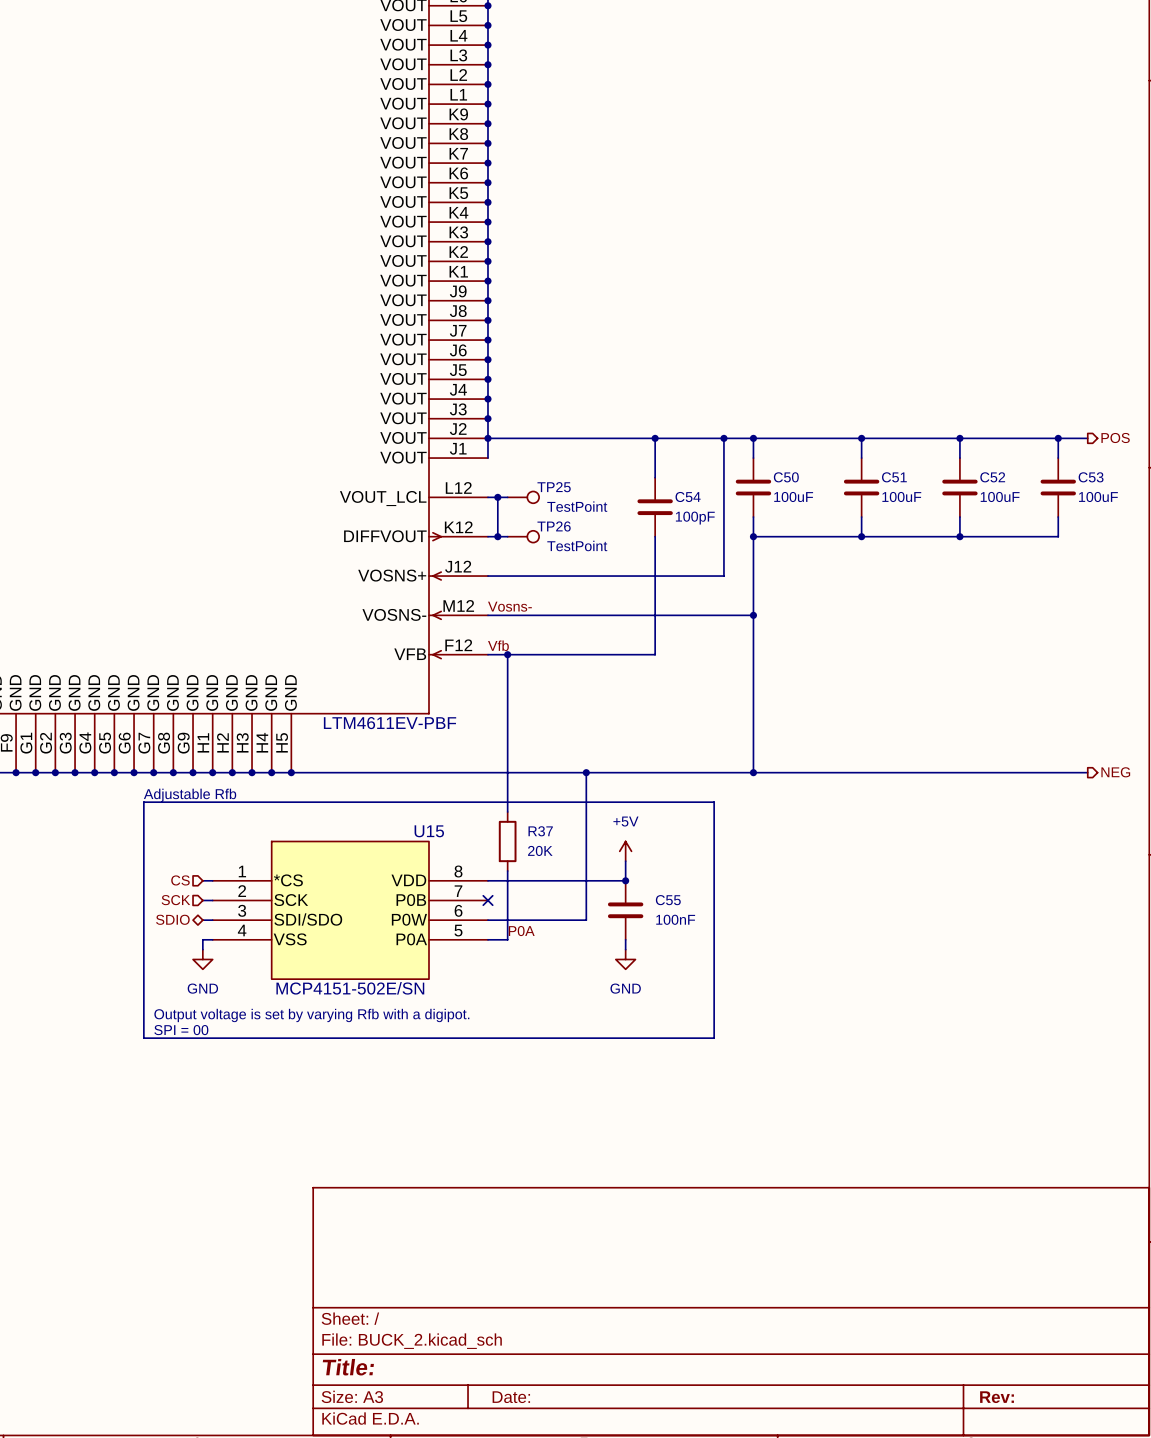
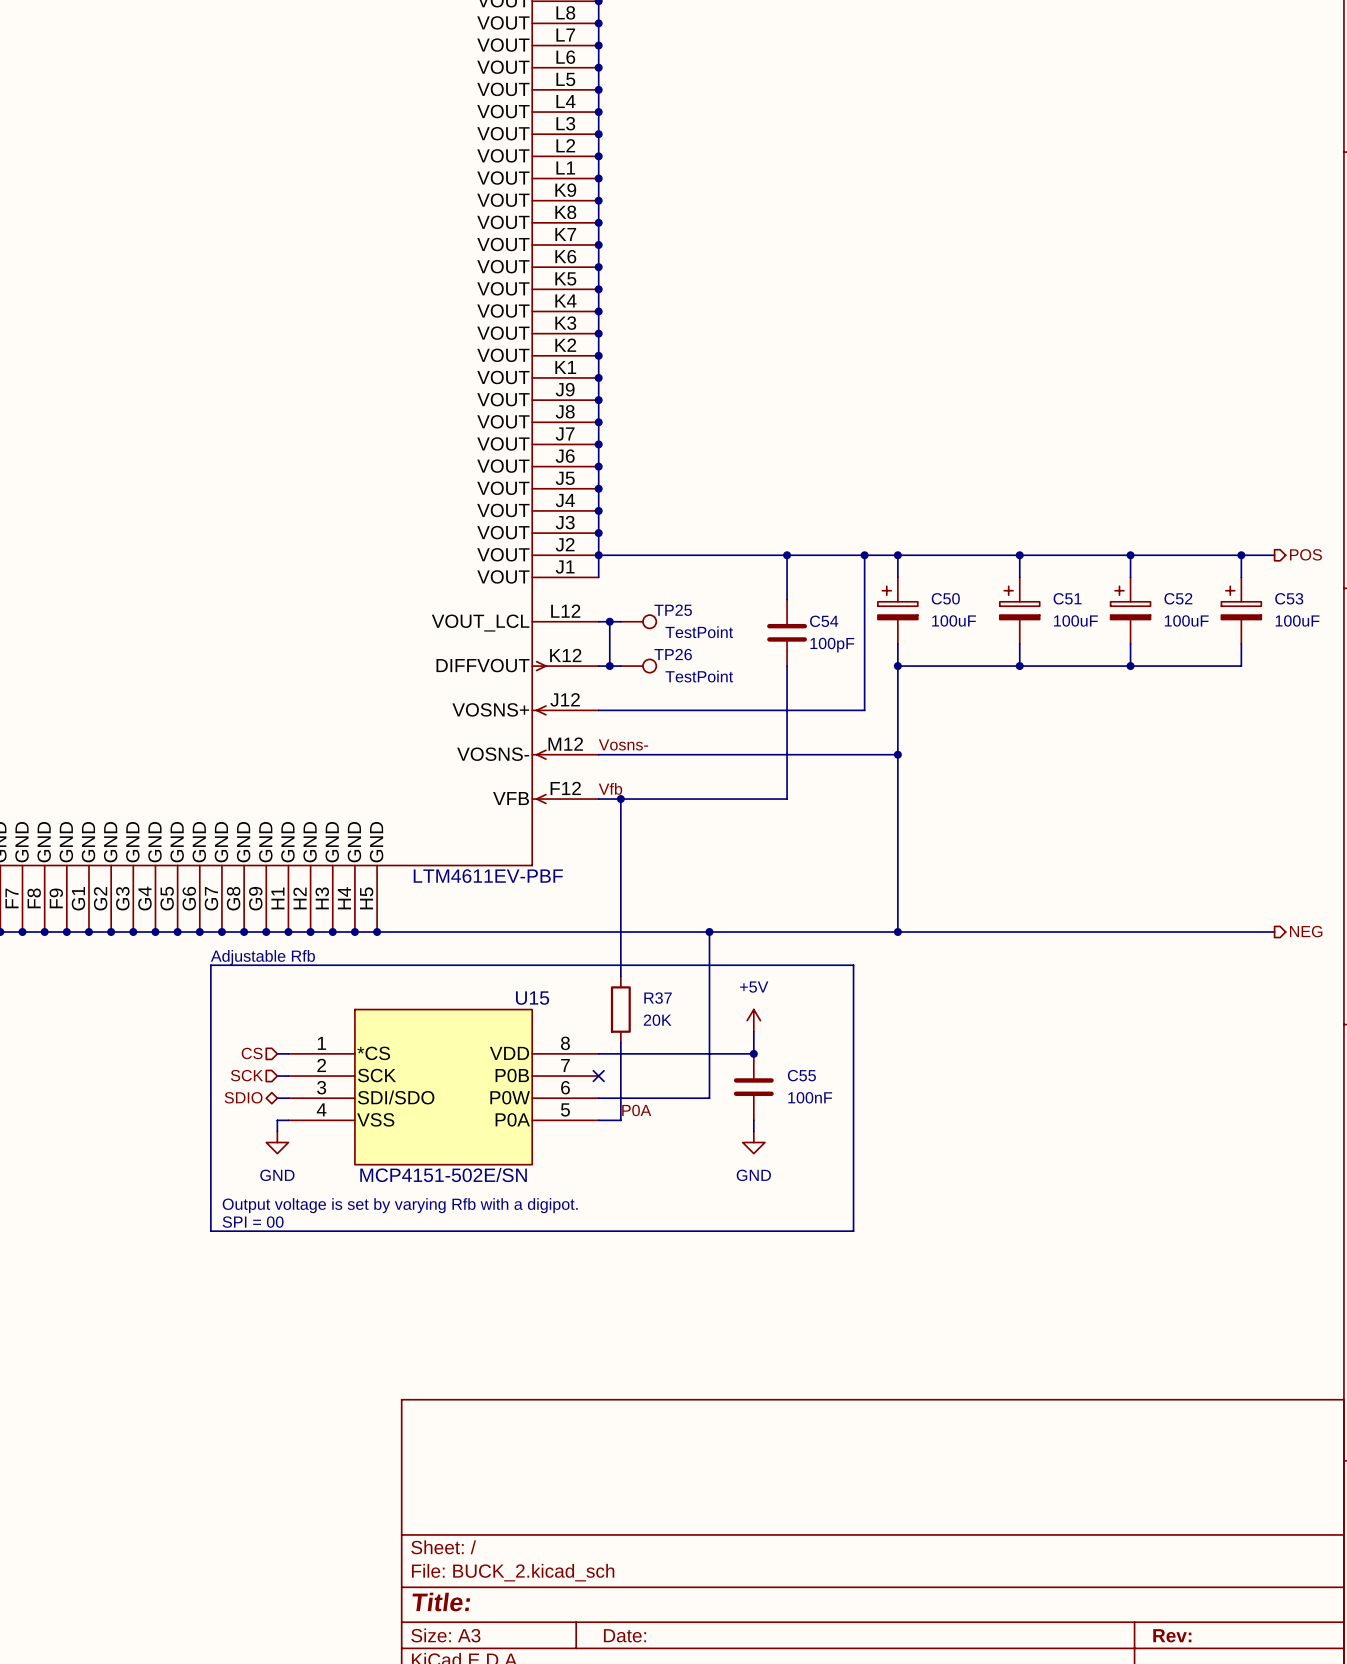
C50 symbol: [735, 458, 772, 518] -> [877, 577, 918, 644]
C51 symbol: [843, 458, 880, 518] -> [999, 577, 1040, 644]
C52 symbol: [942, 458, 978, 518] -> [1110, 577, 1151, 644]
C53 symbol: [1040, 458, 1076, 518] -> [1221, 577, 1262, 644]

